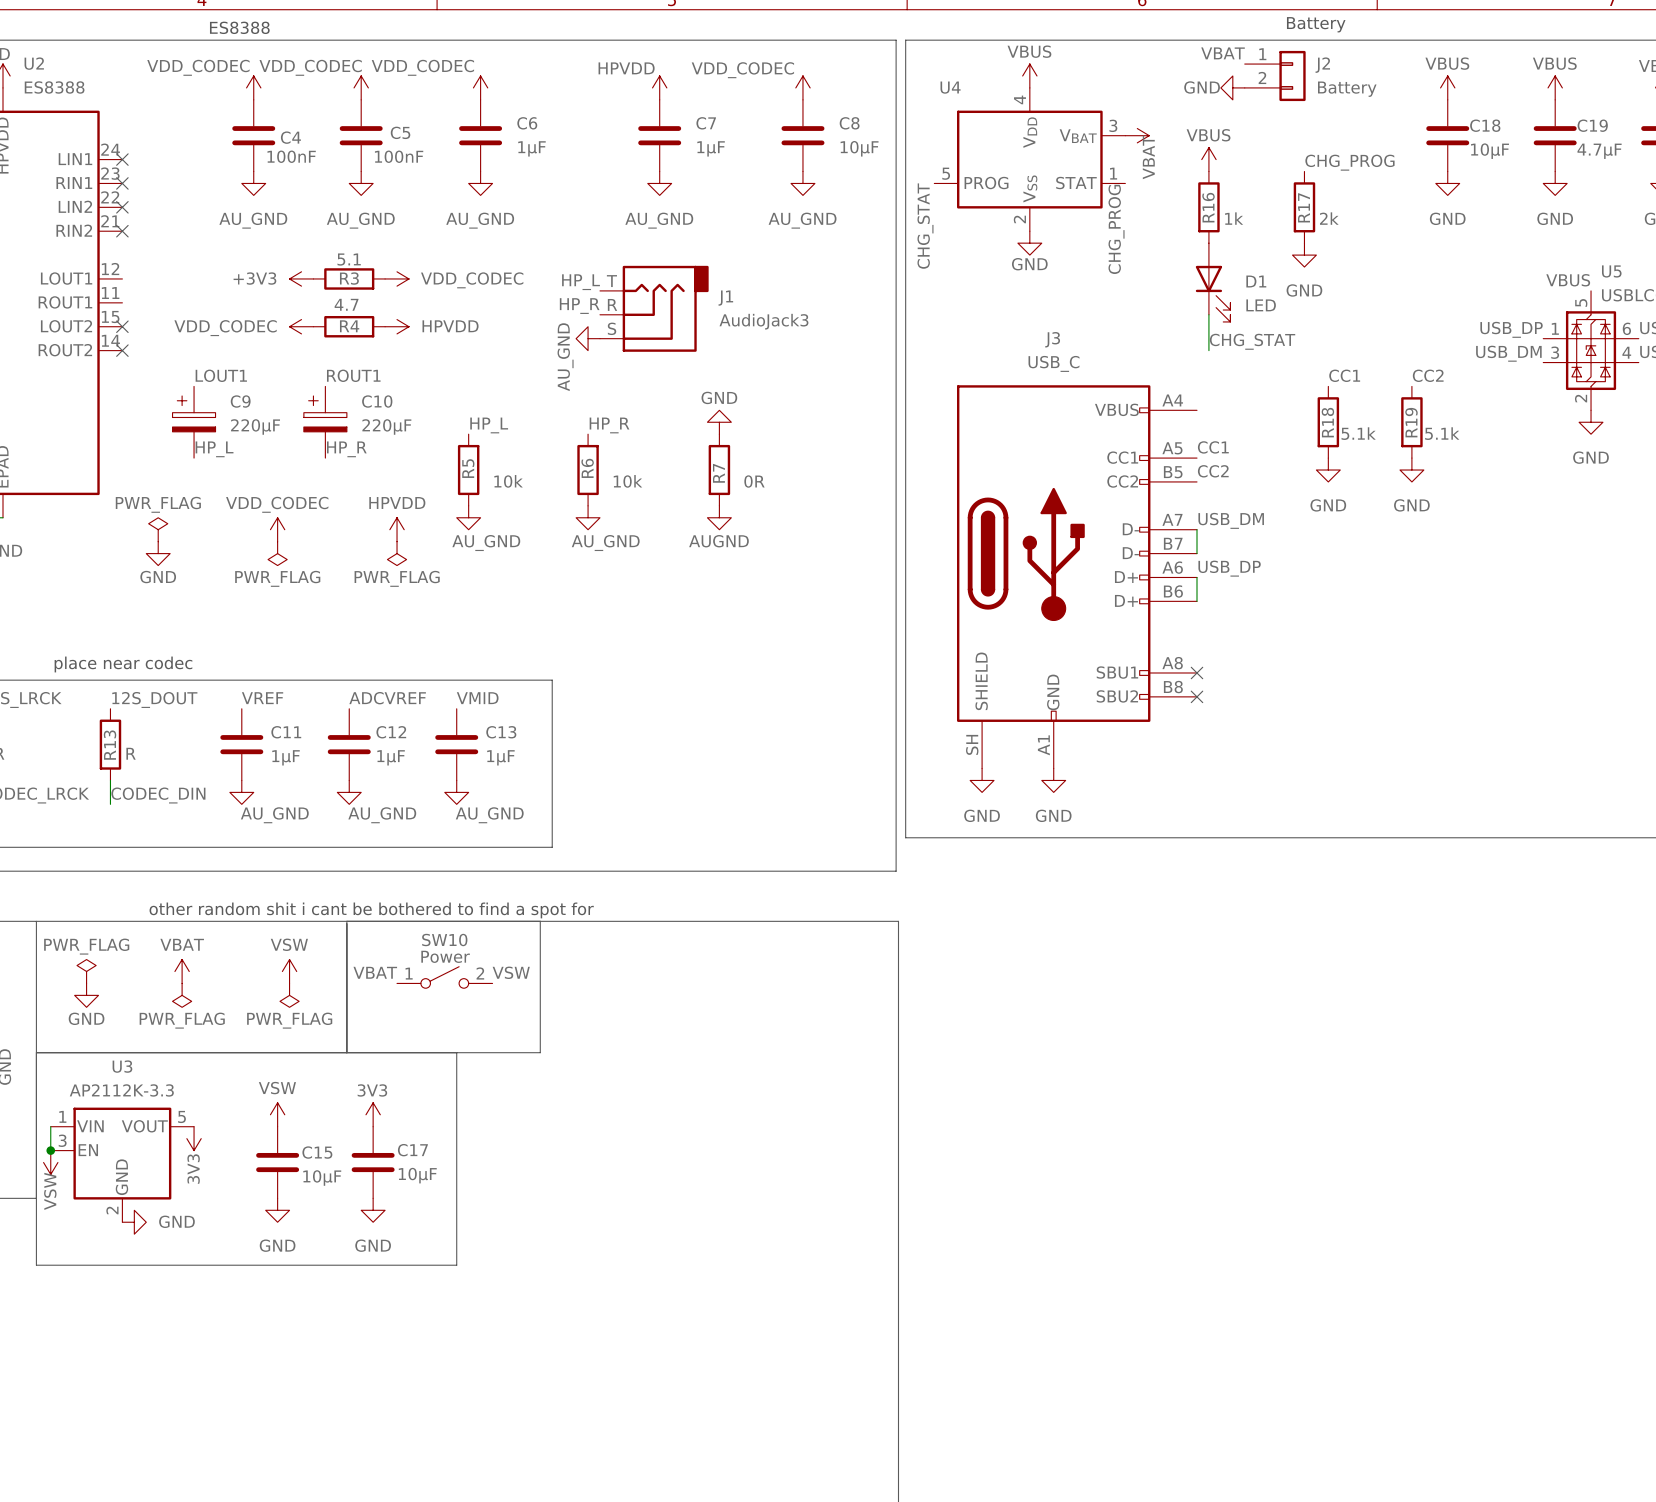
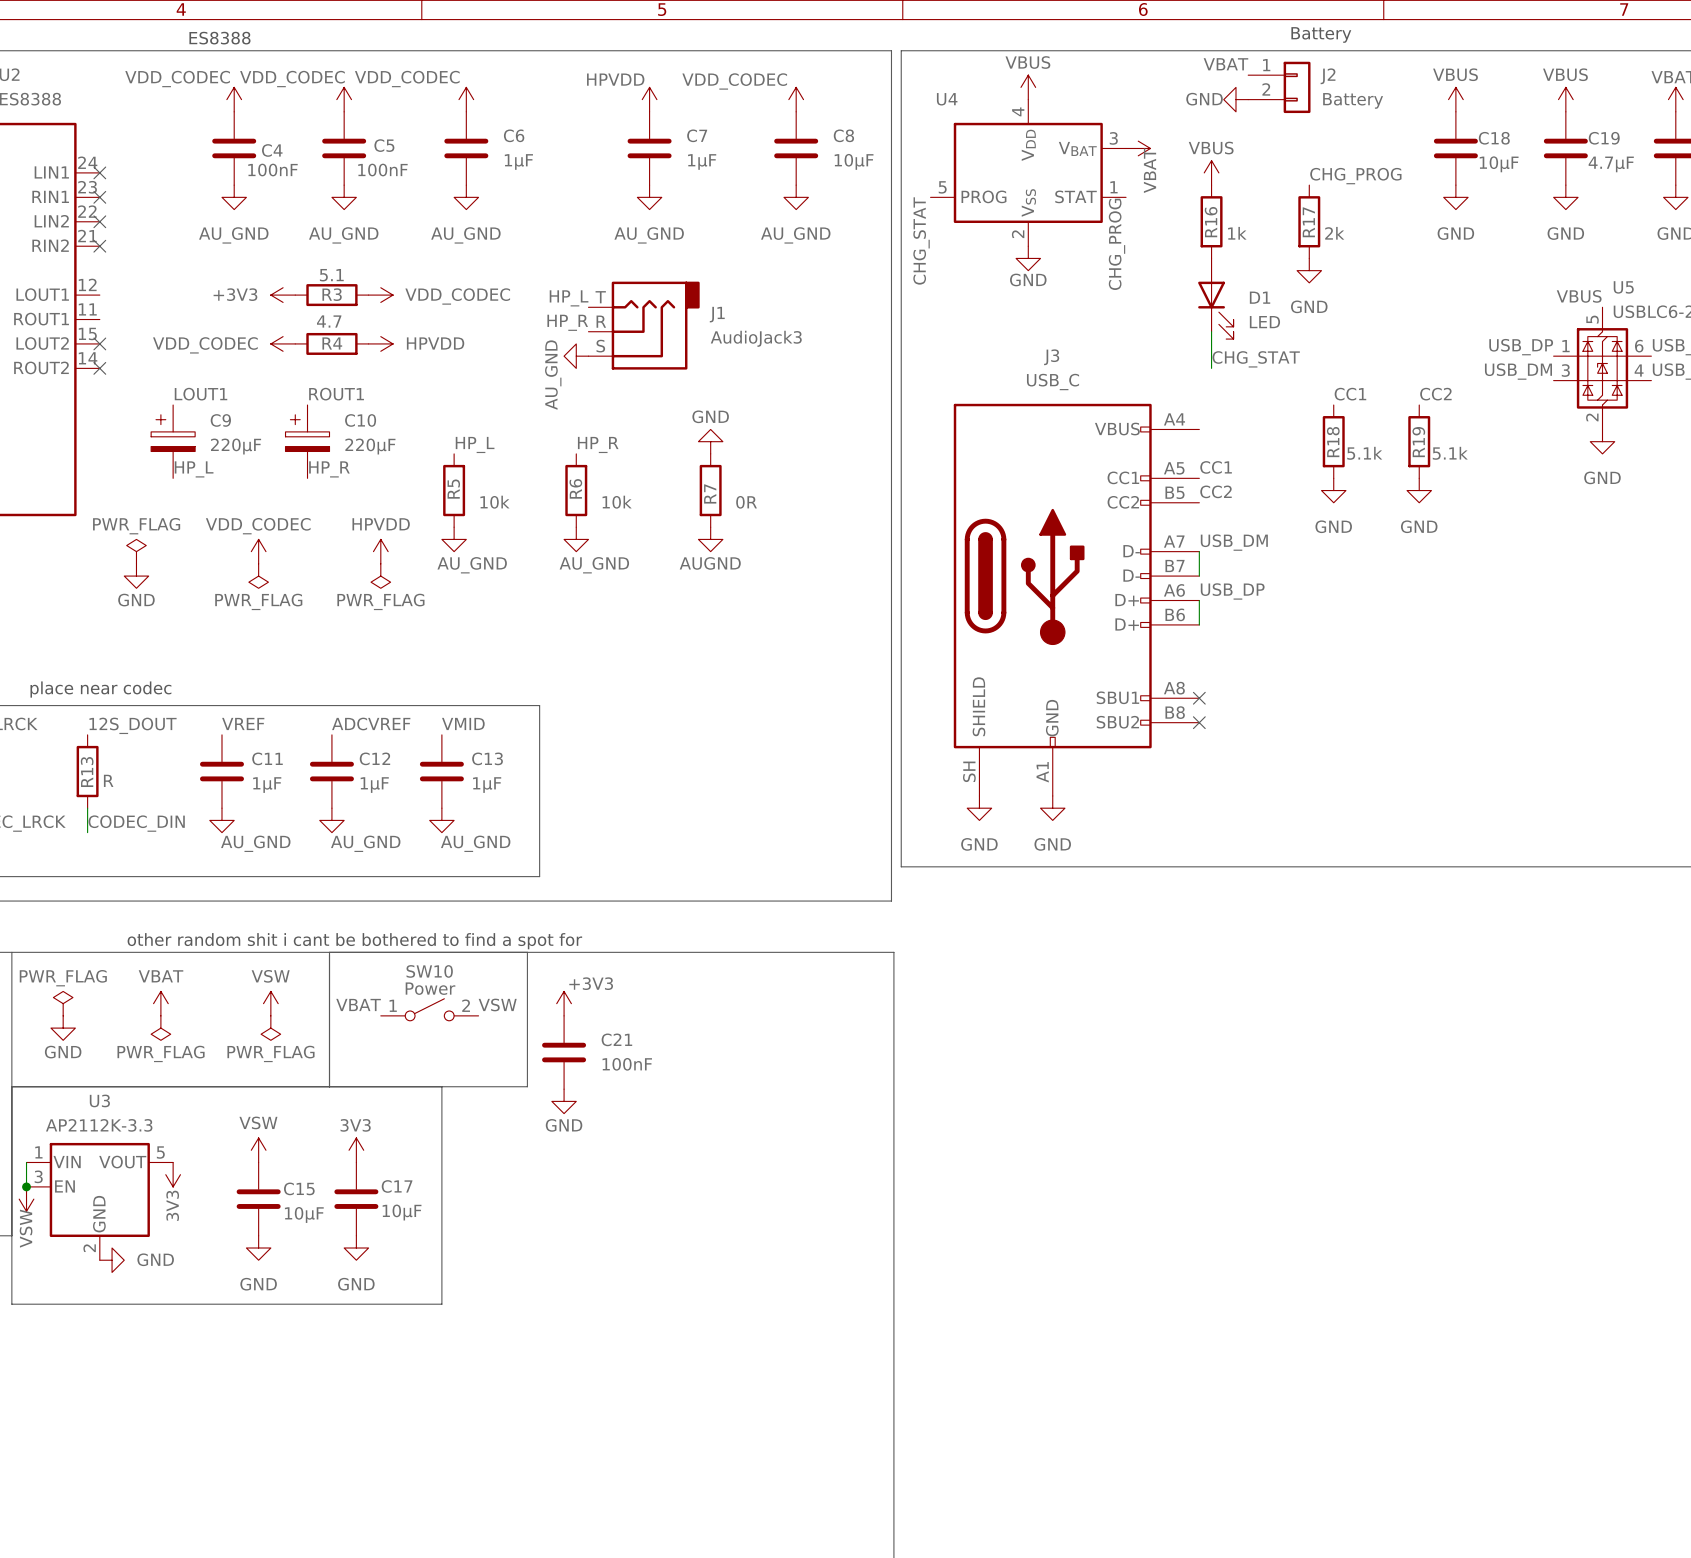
power symbol: none -> +3V3 (564, 1003)
C21: none -> 100nF (564, 1052)
power symbol: none -> GND (564, 1101)

